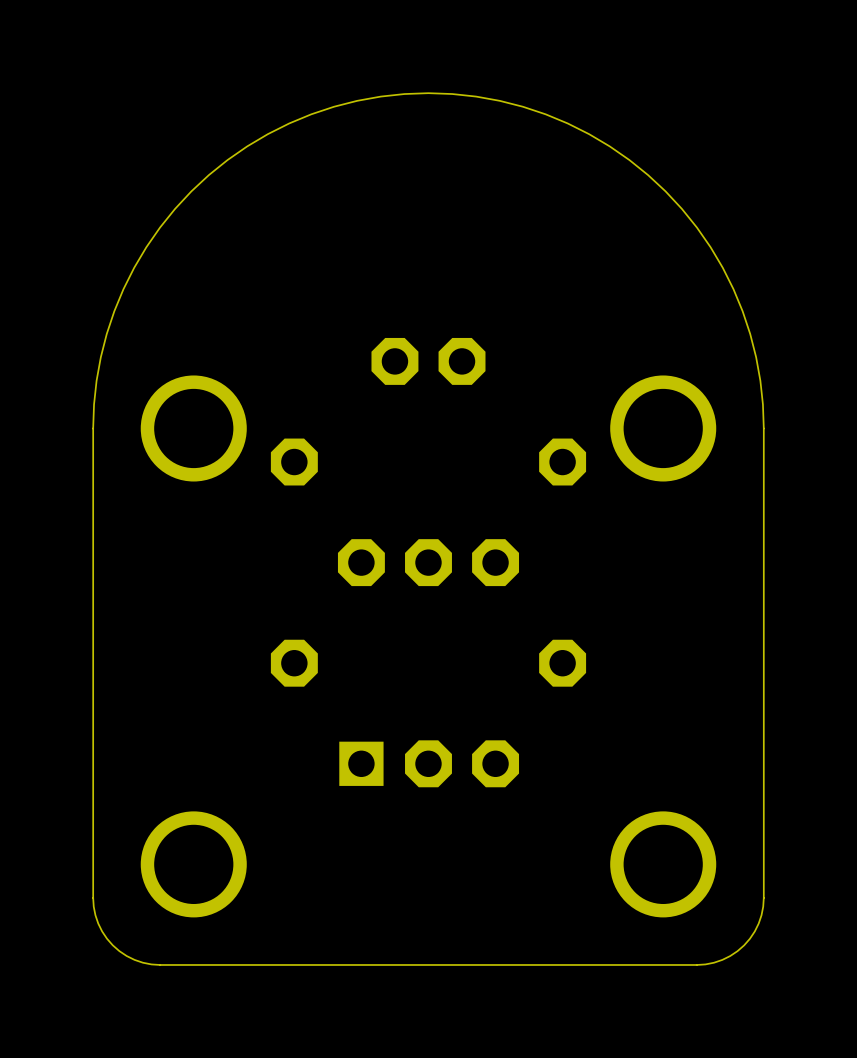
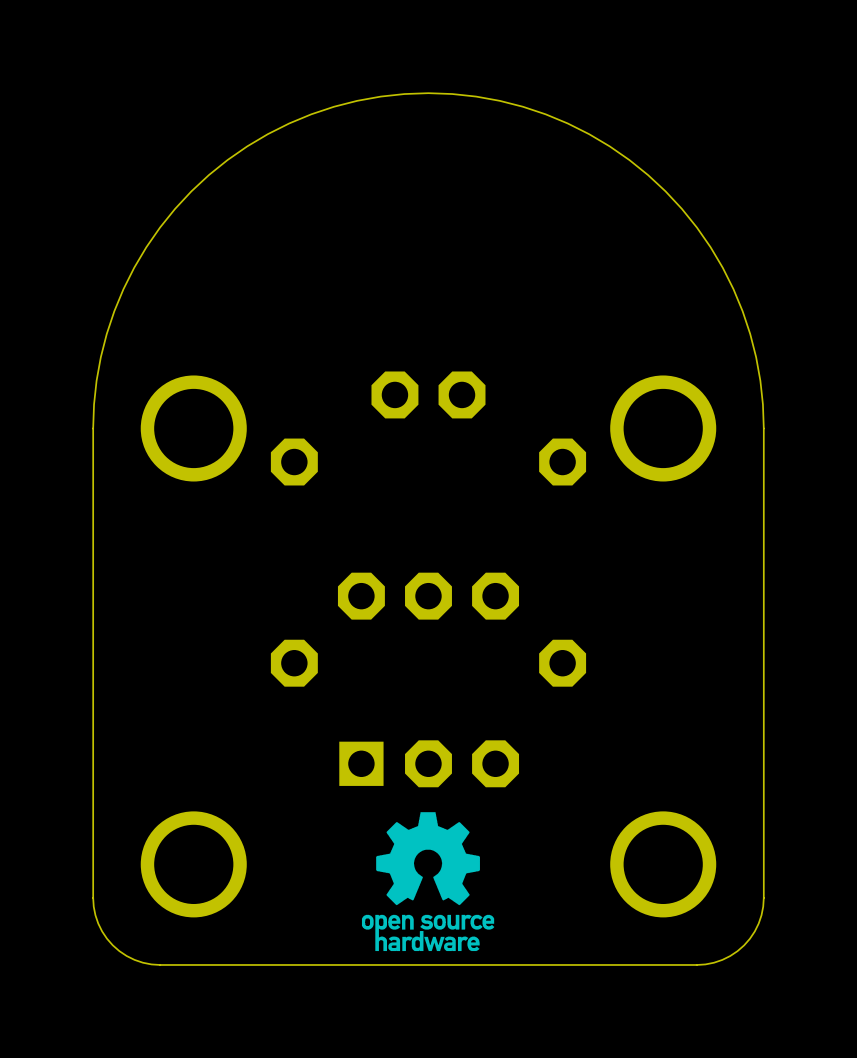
part position: (428, 361) -> (428, 394)
part position: (428, 562) -> (428, 596)
drawing: none -> [361, 812, 495, 952]

